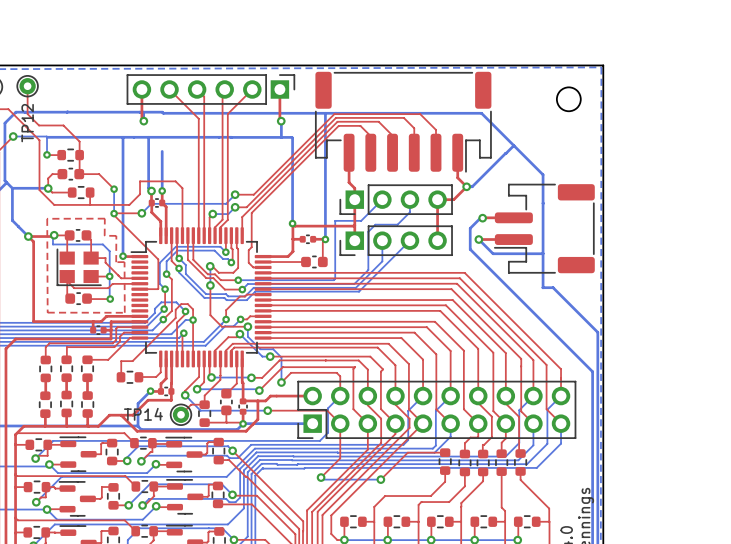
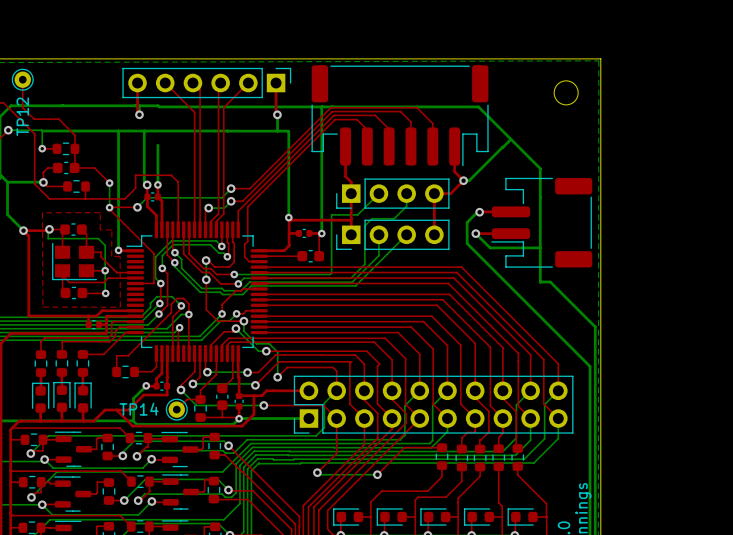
part footprint: [60, 390, 73, 418] -> [53, 381, 71, 413]
part footprint: [39, 391, 52, 419] -> [31, 382, 50, 413]
part footprint: [81, 391, 95, 418] -> [74, 382, 92, 413]
part footprint: [340, 515, 367, 529] -> [333, 508, 364, 526]
part footprint: [383, 515, 411, 529] -> [376, 508, 407, 526]
part footprint: [427, 515, 454, 529] -> [420, 508, 451, 526]
part footprint: [470, 515, 498, 529] -> [463, 508, 495, 526]
part footprint: [513, 515, 541, 529] -> [507, 508, 538, 526]

